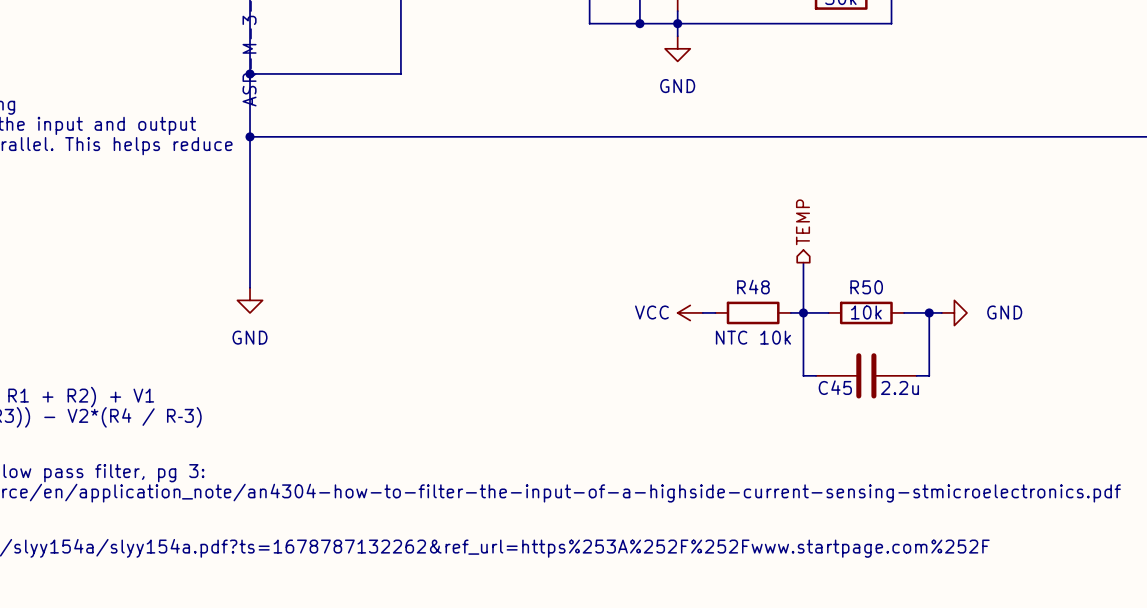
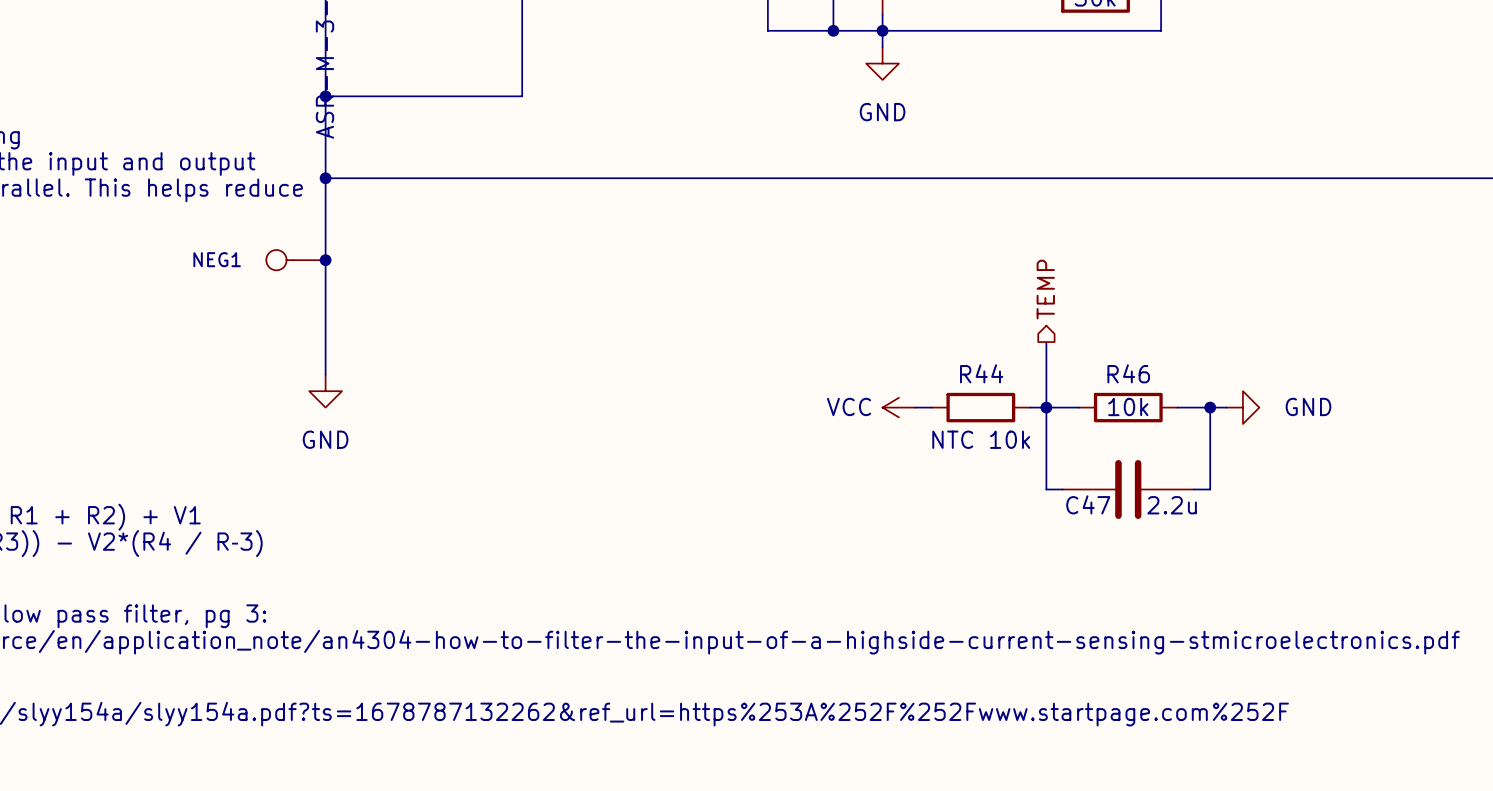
NEG1: none -> (295, 260)
junction: none -> (325, 260)
R48 name: R48 (753, 287) -> R44 (981, 373)
R50 name: R50 (866, 287) -> R46 (1128, 373)
C45 name: C45 (835, 387) -> C47 (1088, 504)

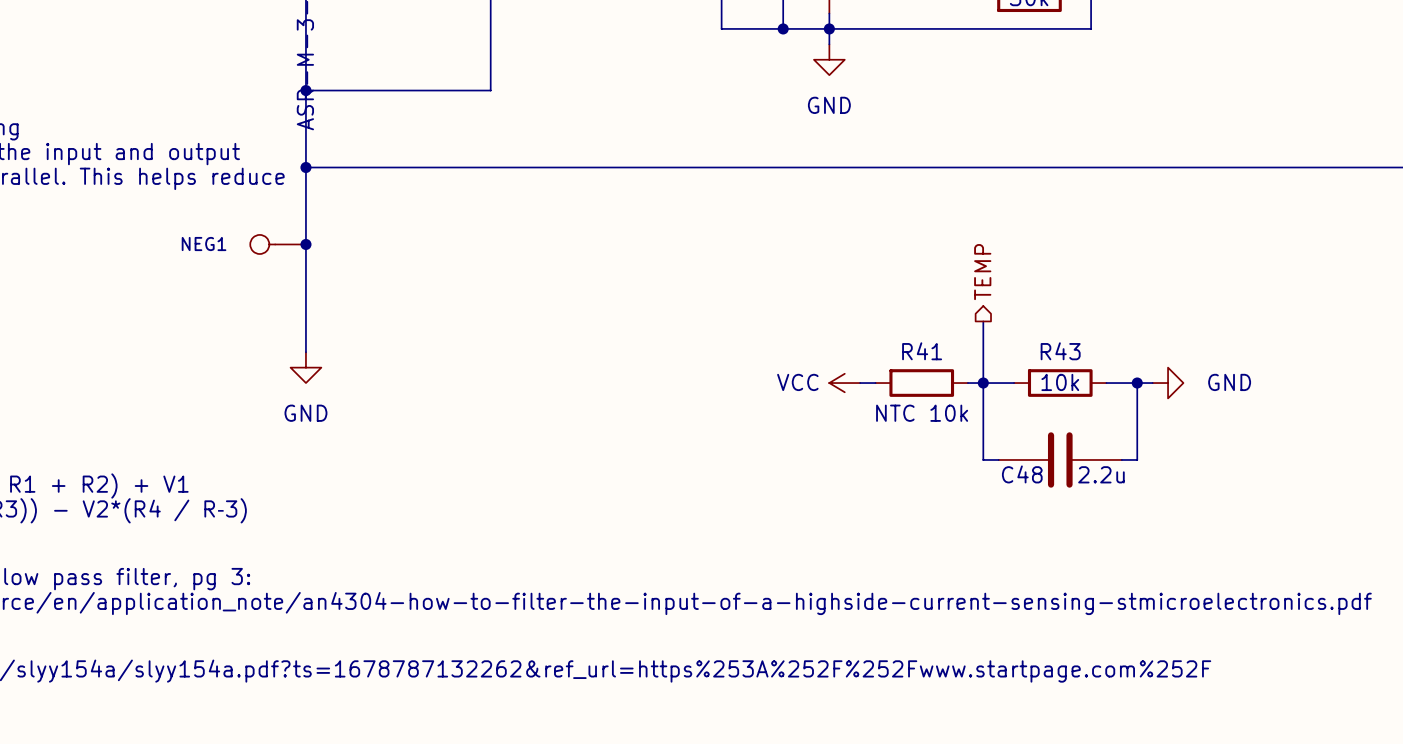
R44 name: R44 (981, 373) -> R41 (922, 351)
R46 name: R46 (1128, 373) -> R43 (1060, 351)
C47 name: C47 (1088, 504) -> C48 (1022, 474)

